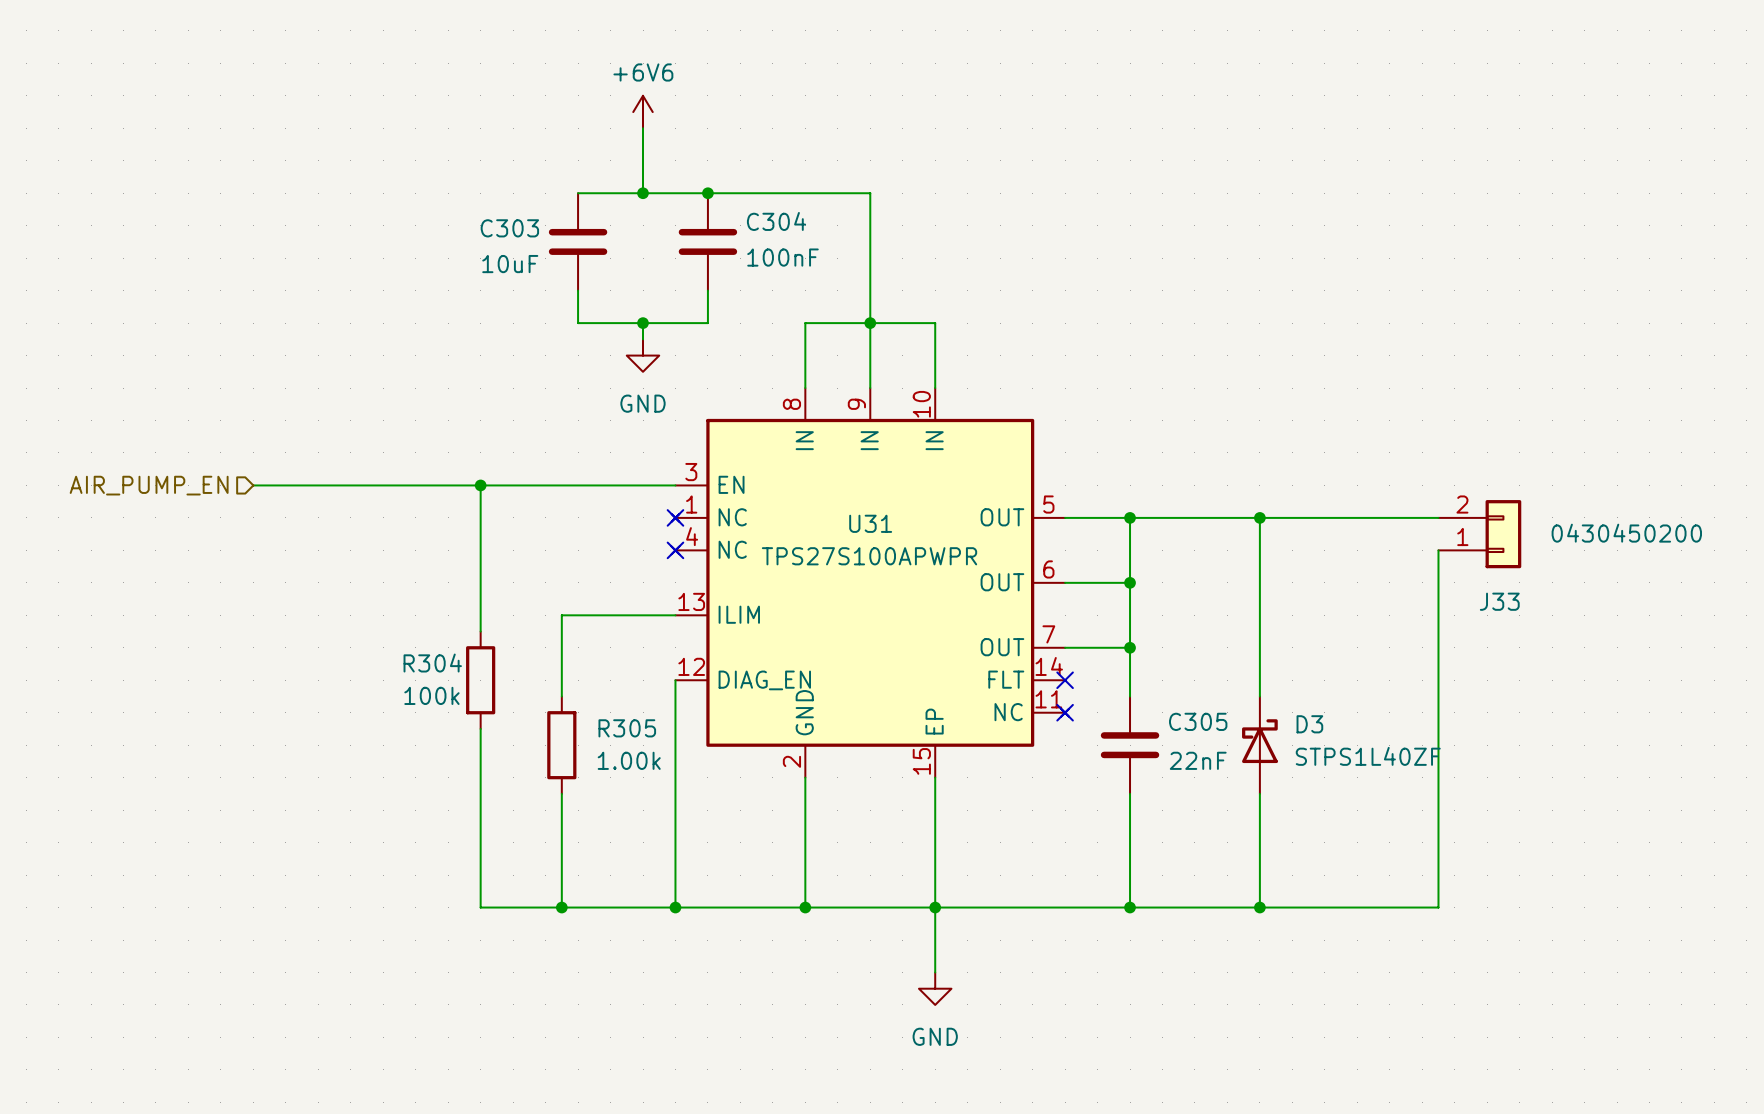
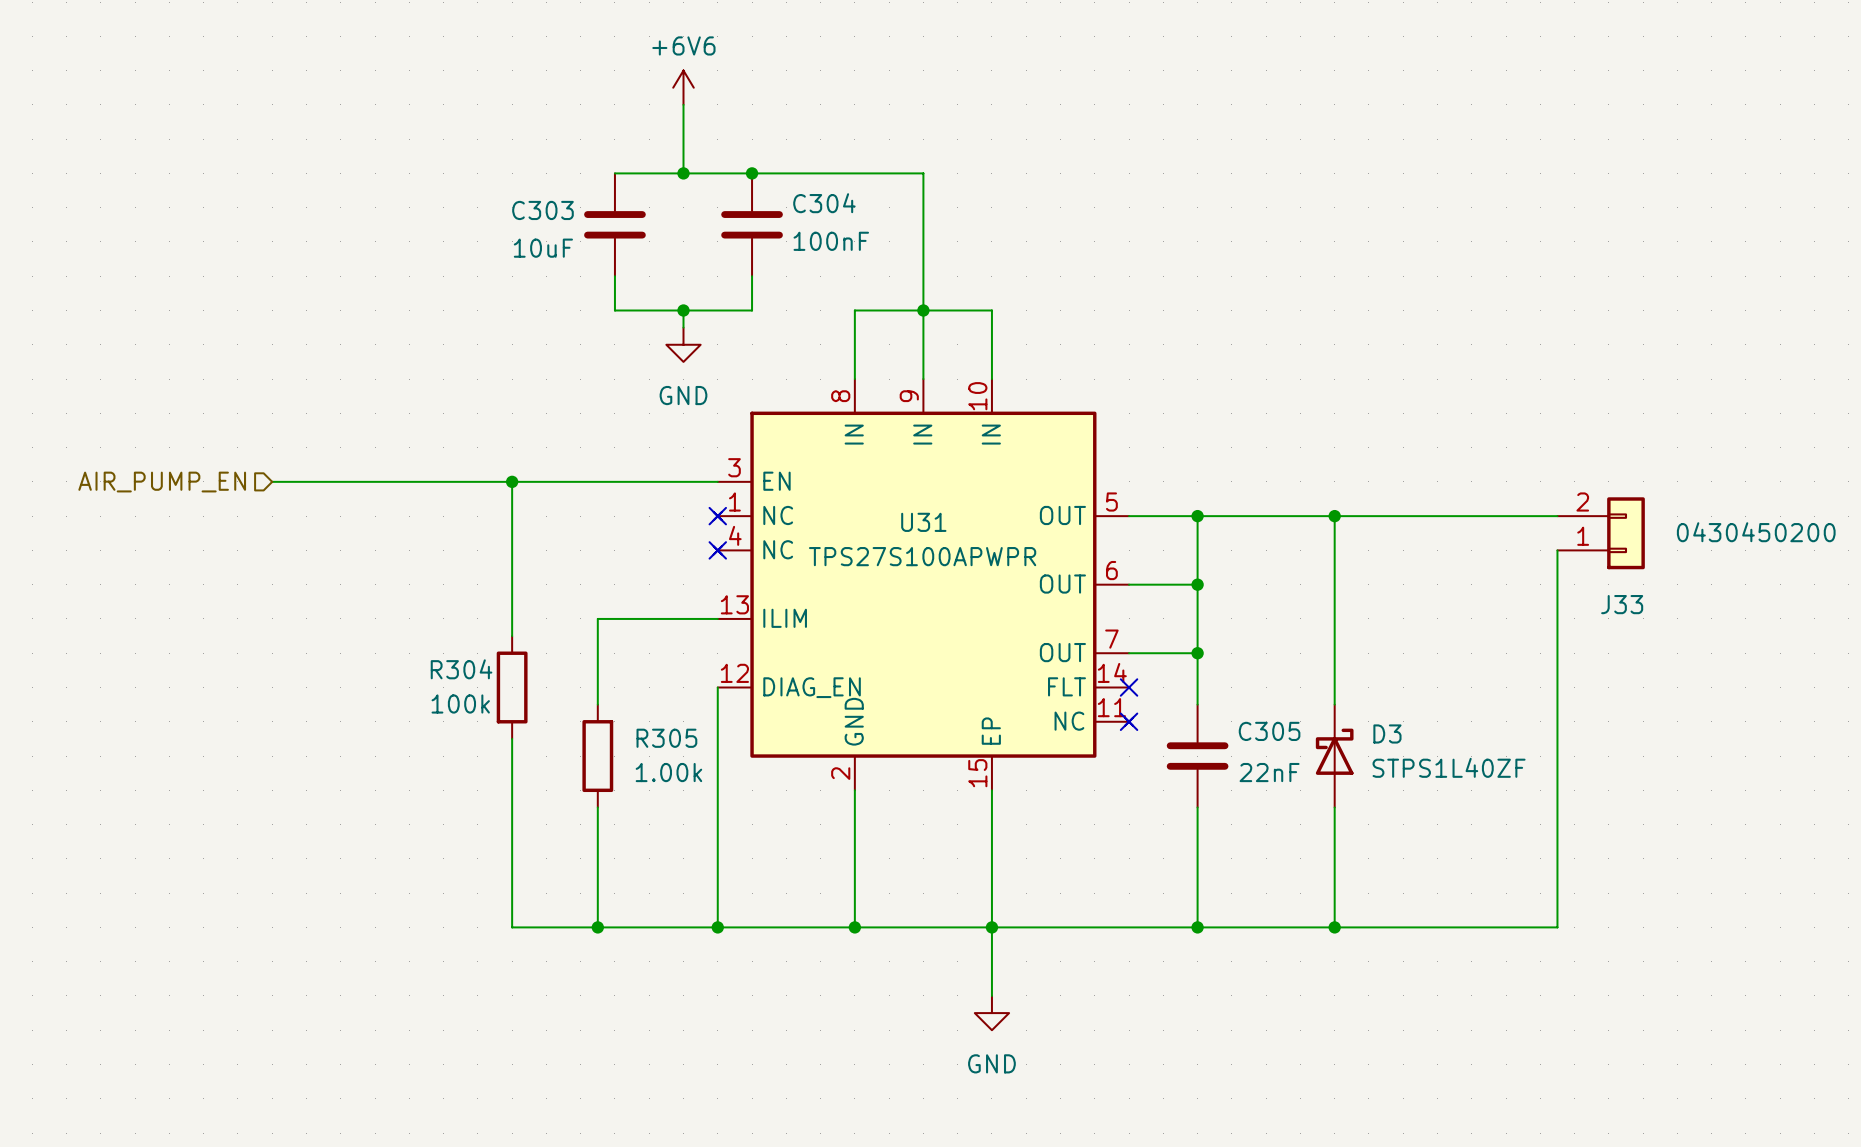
J33 position: (1479, 534) -> (1601, 533)
wire: (1438, 550) (1438, 907) -> (1557, 550) (1557, 927) (1523, 927)

